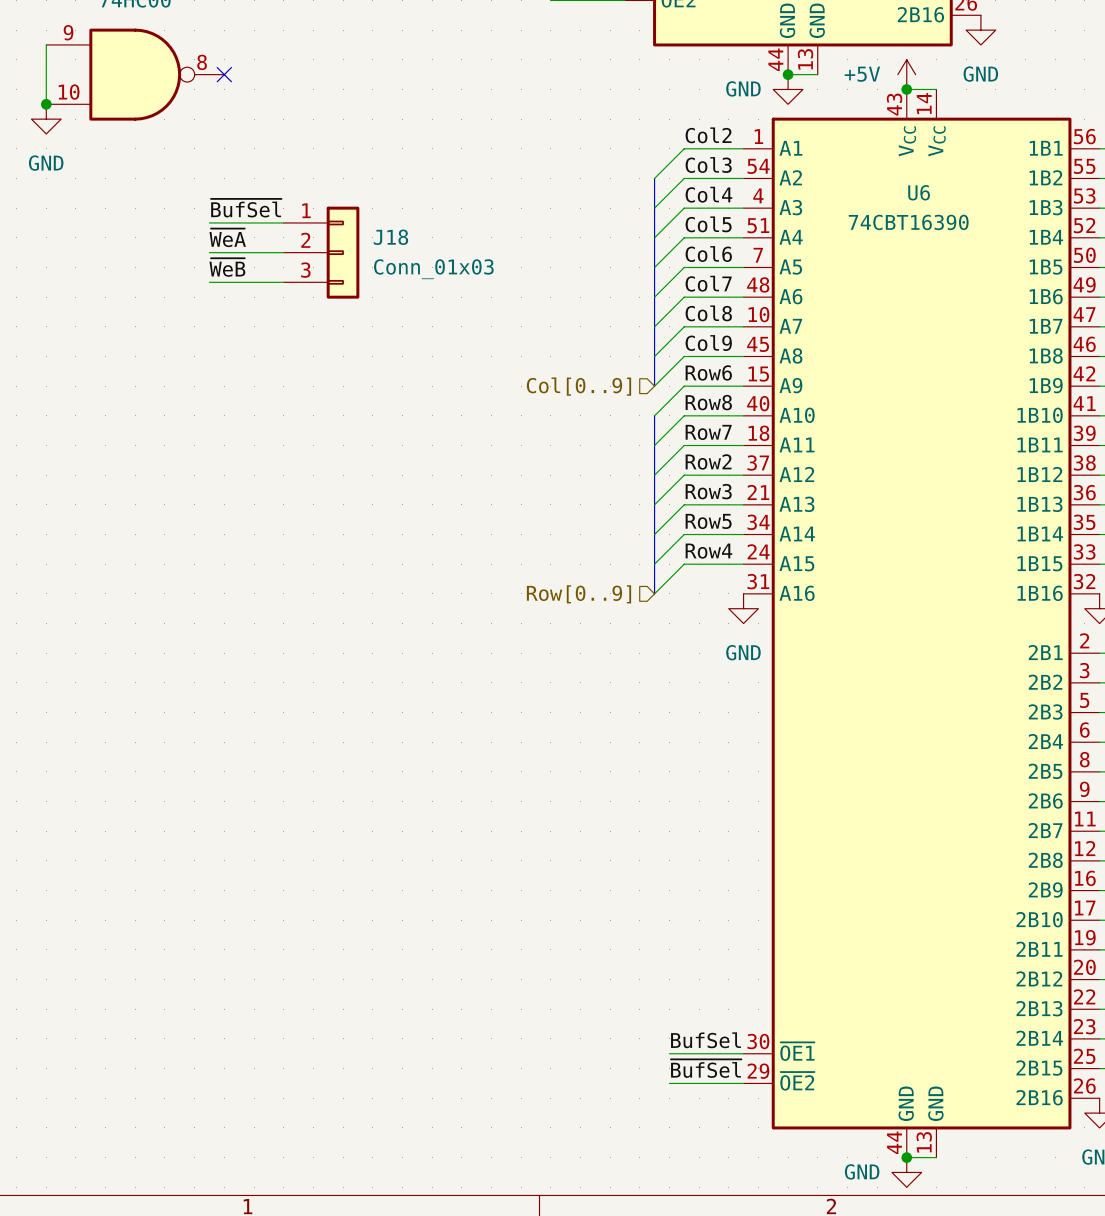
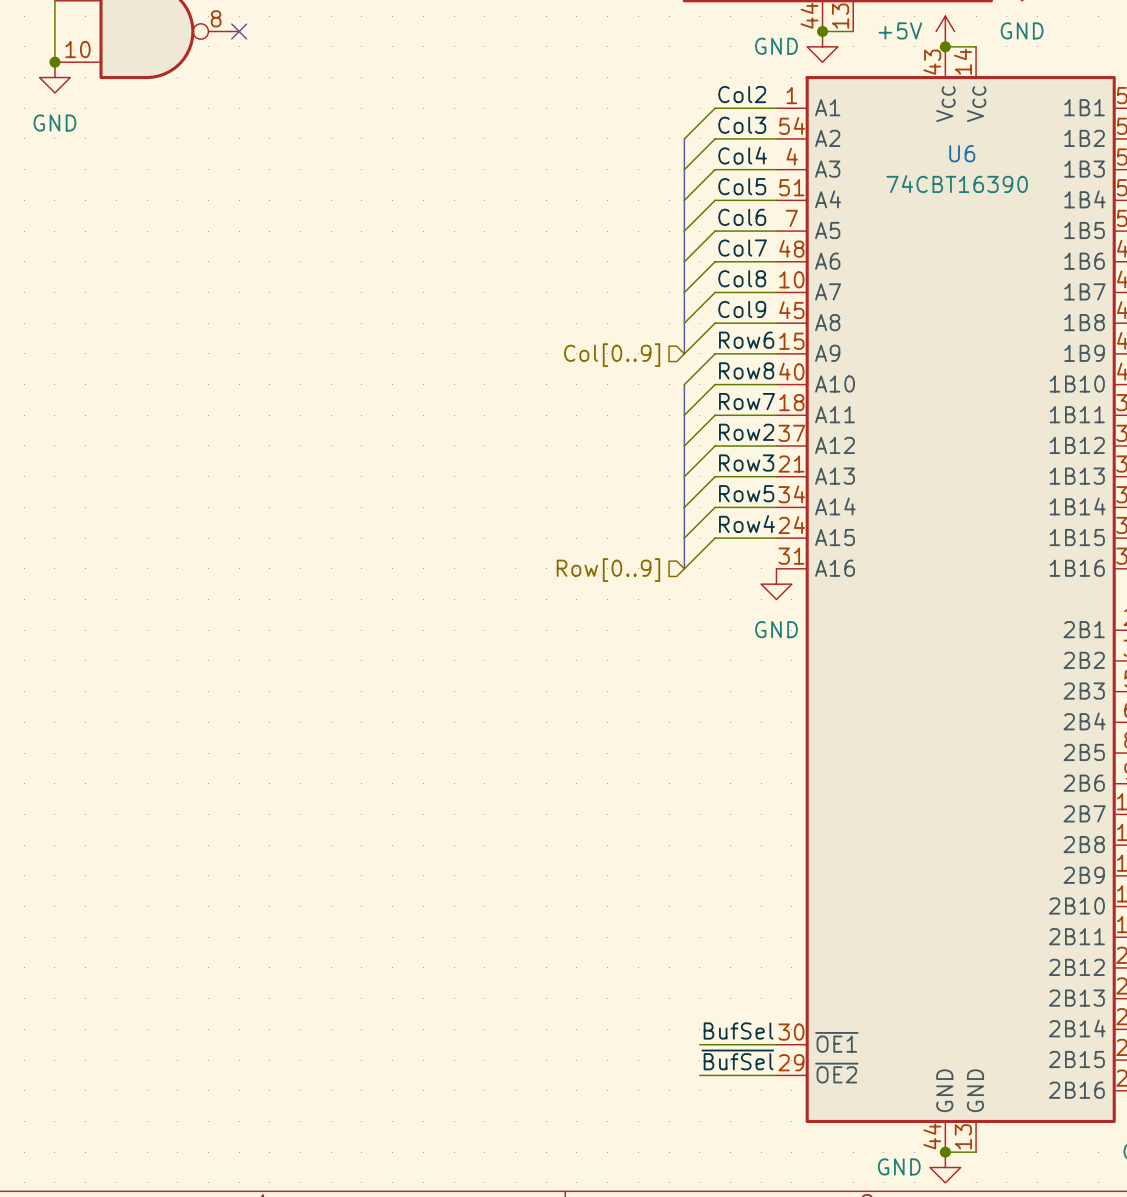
label: ~{BufSel} (246, 208) -> none
wire: (209, 222) (283, 222) -> none
label: ~{WeA} (227, 237) -> none
wire: (209, 252) (283, 252) -> none
J18: Conn_01x03 (321, 252) -> none
label: ~{WeB} (227, 267) -> none
wire: (209, 282) (283, 282) -> none

